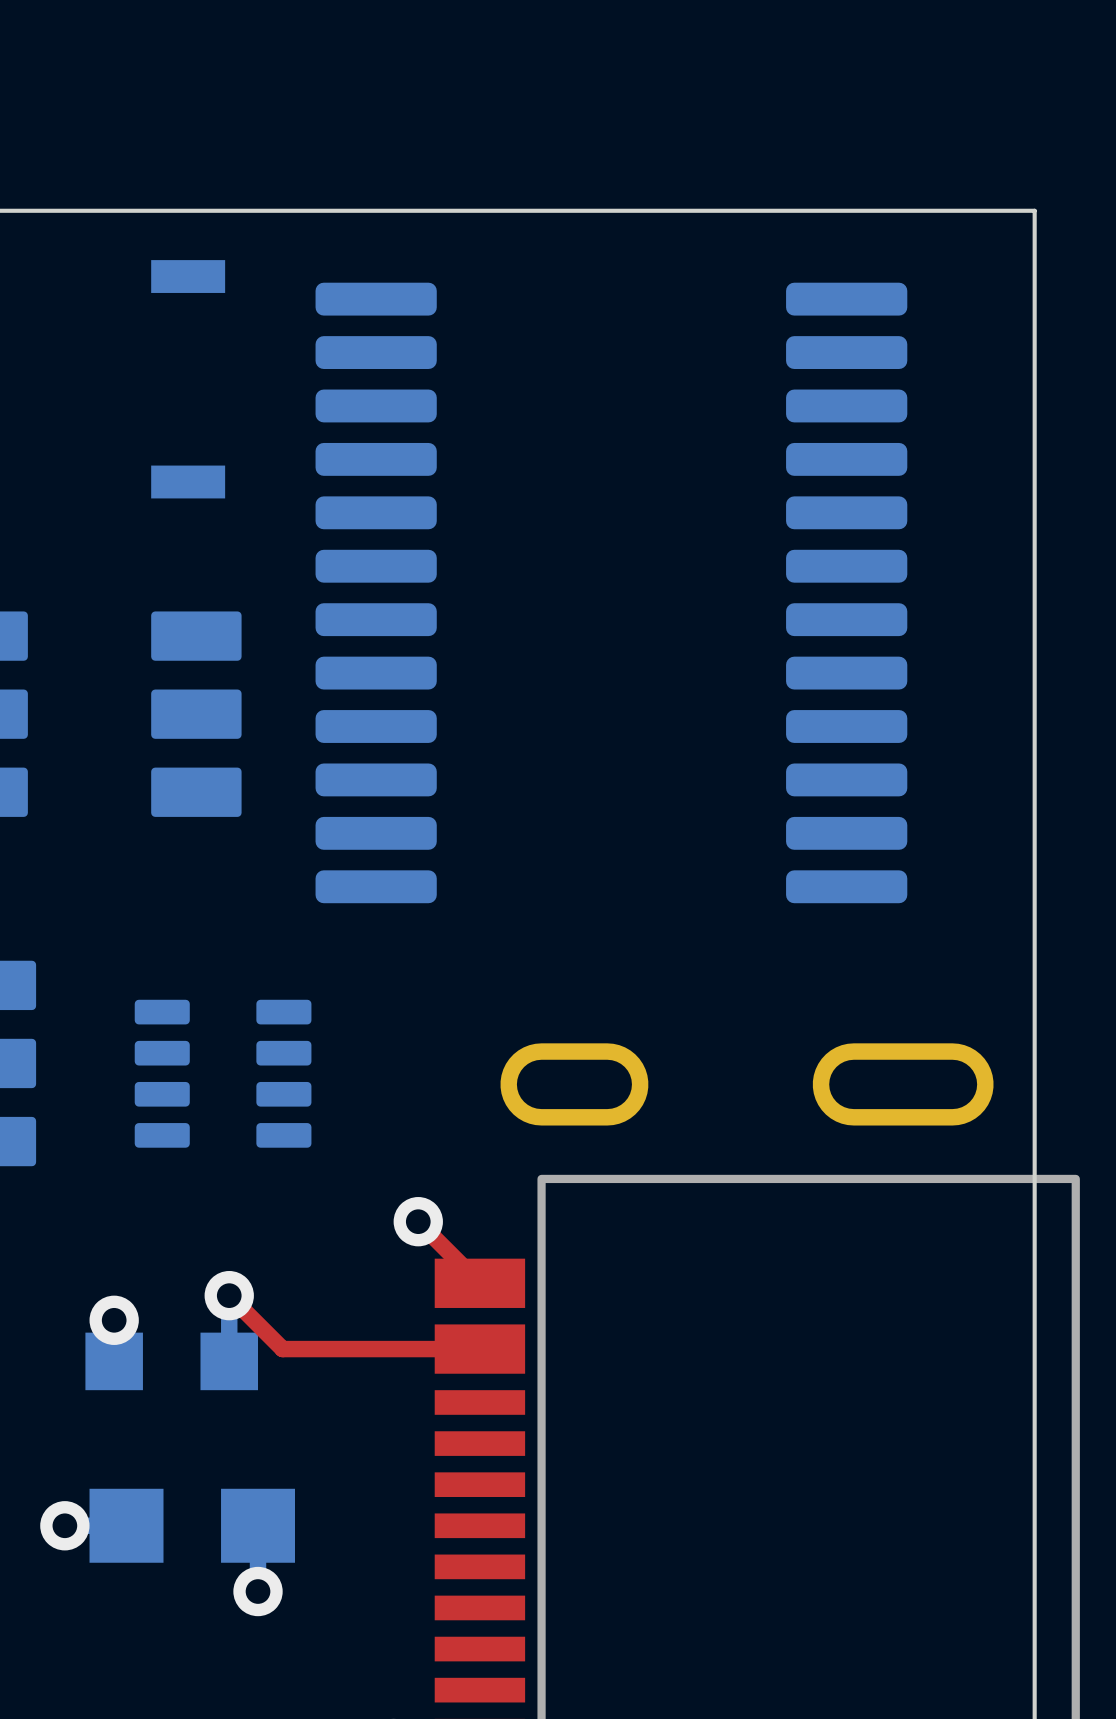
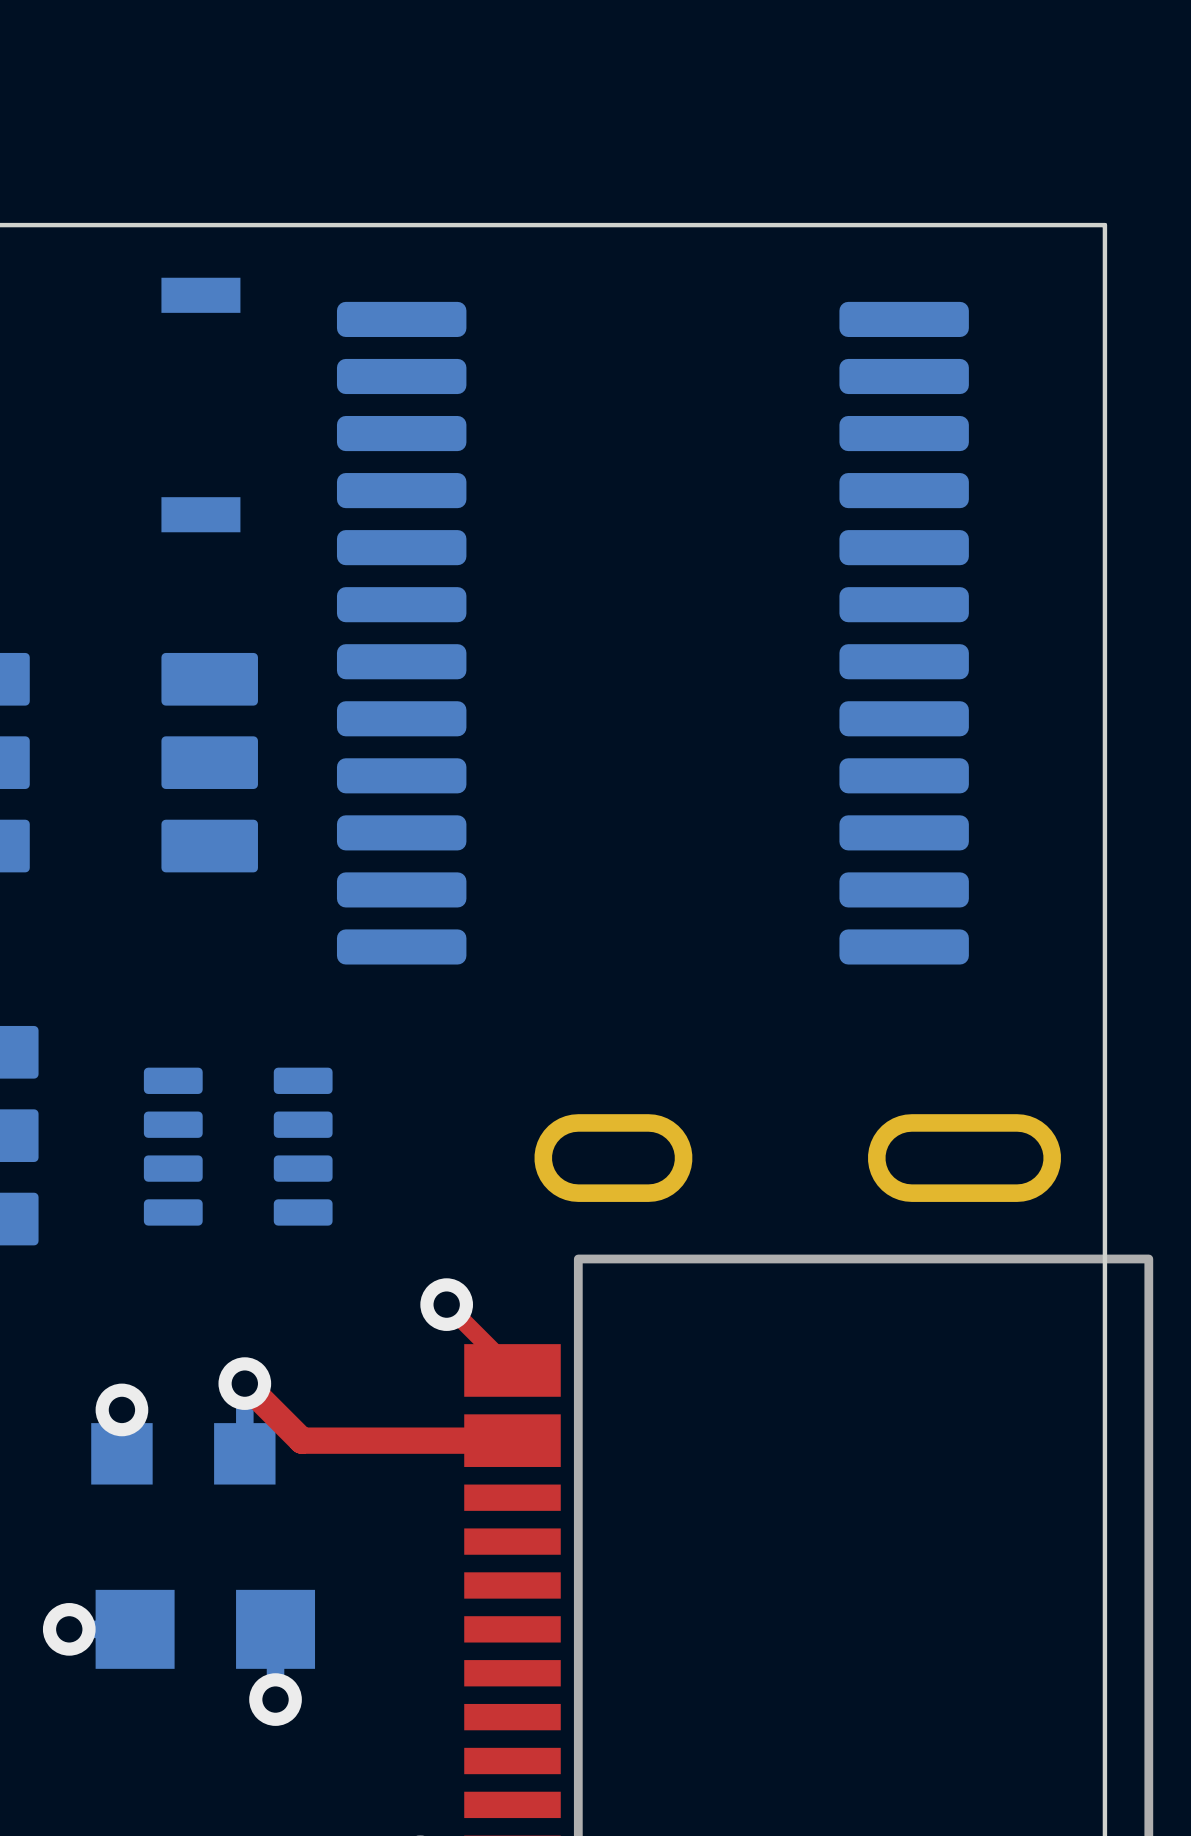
top track width: thin (229, 1295) (282, 1349) (479, 1349) -> thick (244, 1383) (301, 1440) (512, 1440)

